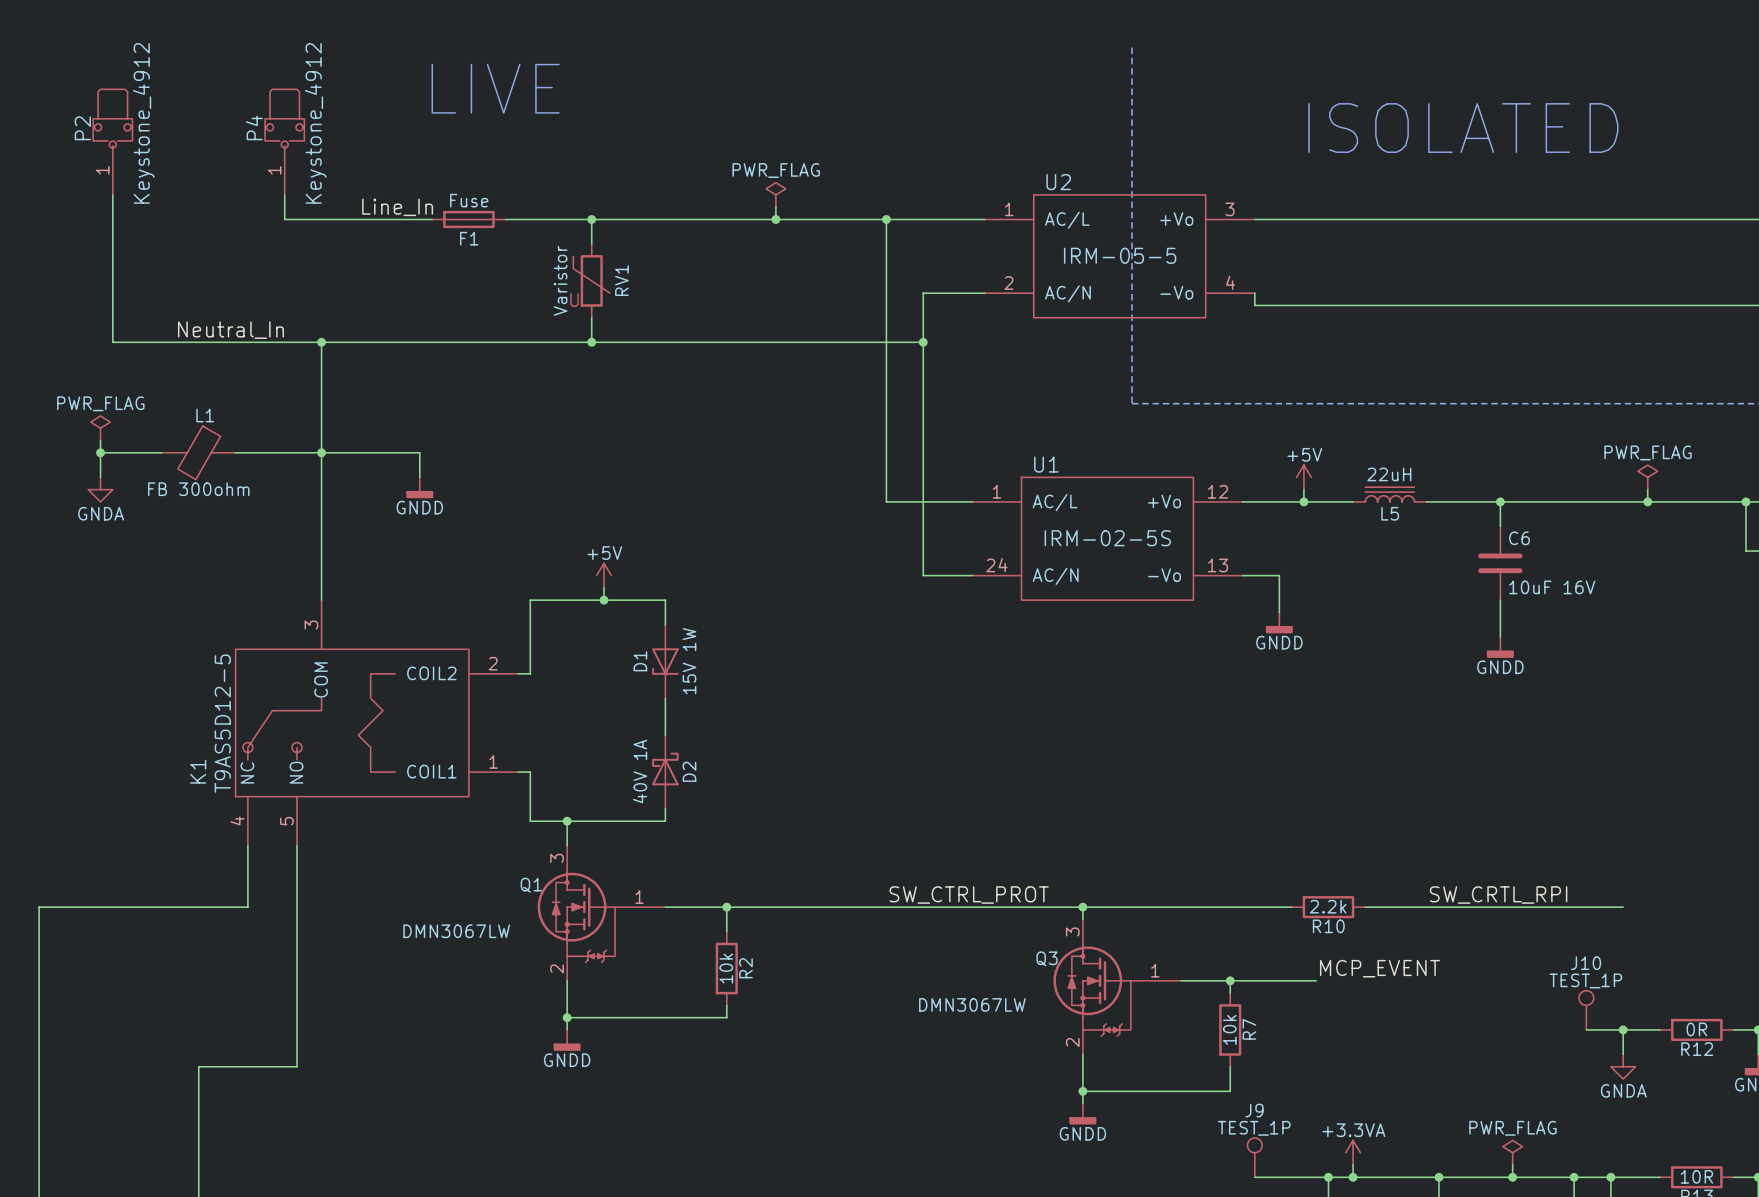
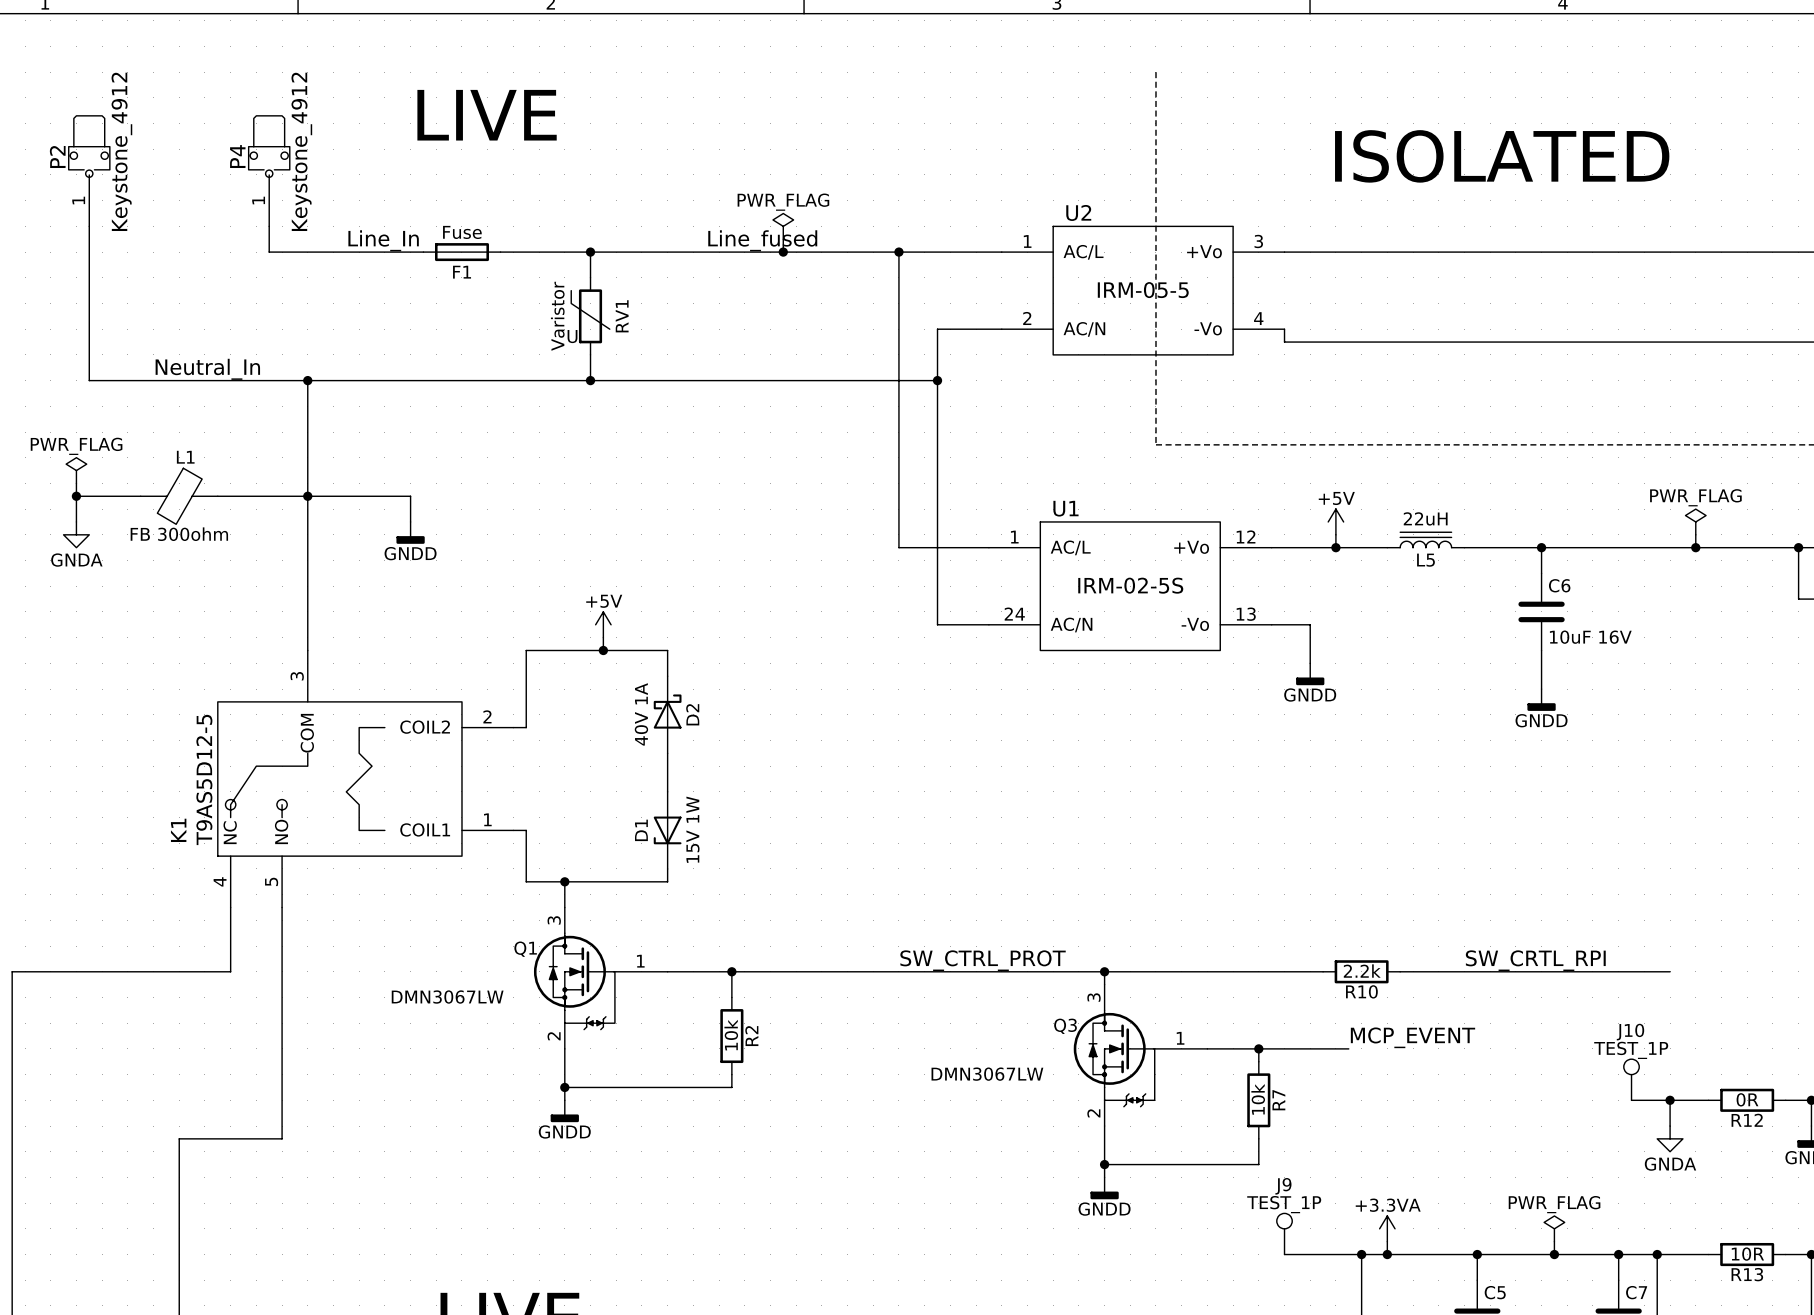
label: none -> Line_fused (762, 240)
D1 position: (665, 661) -> (667, 830)
D2 position: (665, 772) -> (667, 714)

